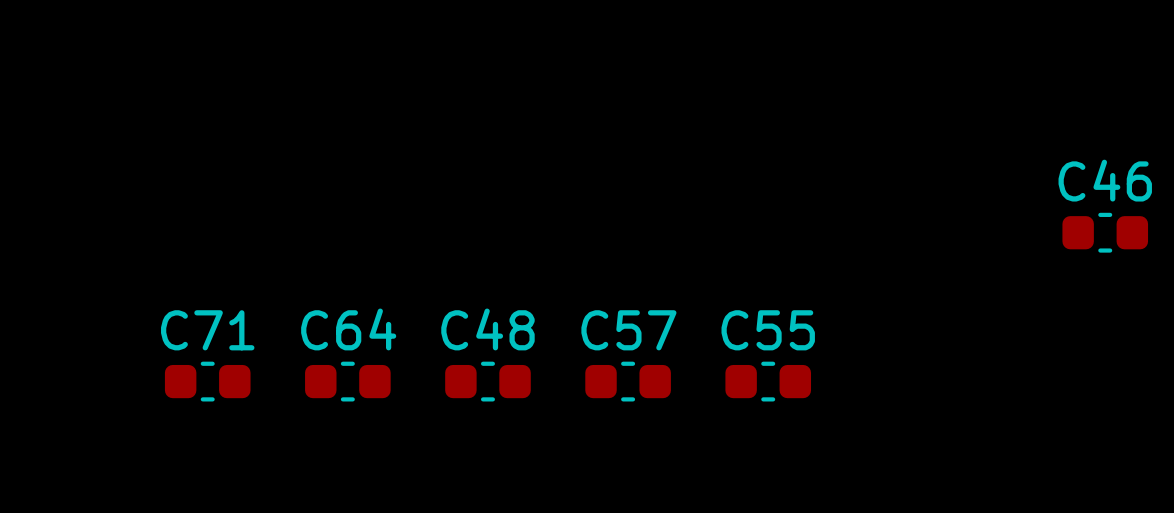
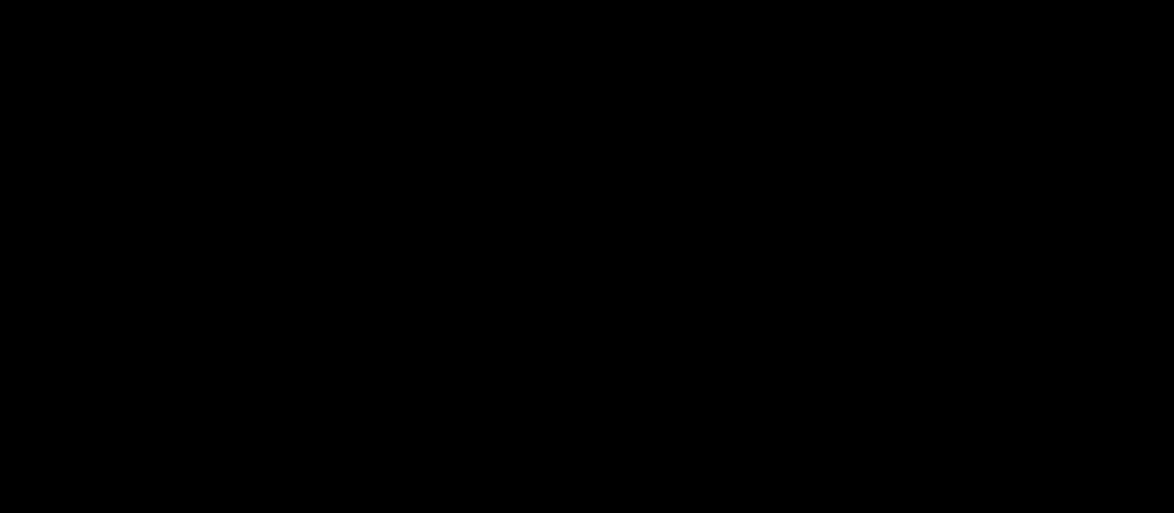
C46: (1105, 232) -> none
C71: (207, 381) -> none
C64: (347, 381) -> none
C48: (487, 381) -> none
C57: (628, 381) -> none
C55: (768, 381) -> none

